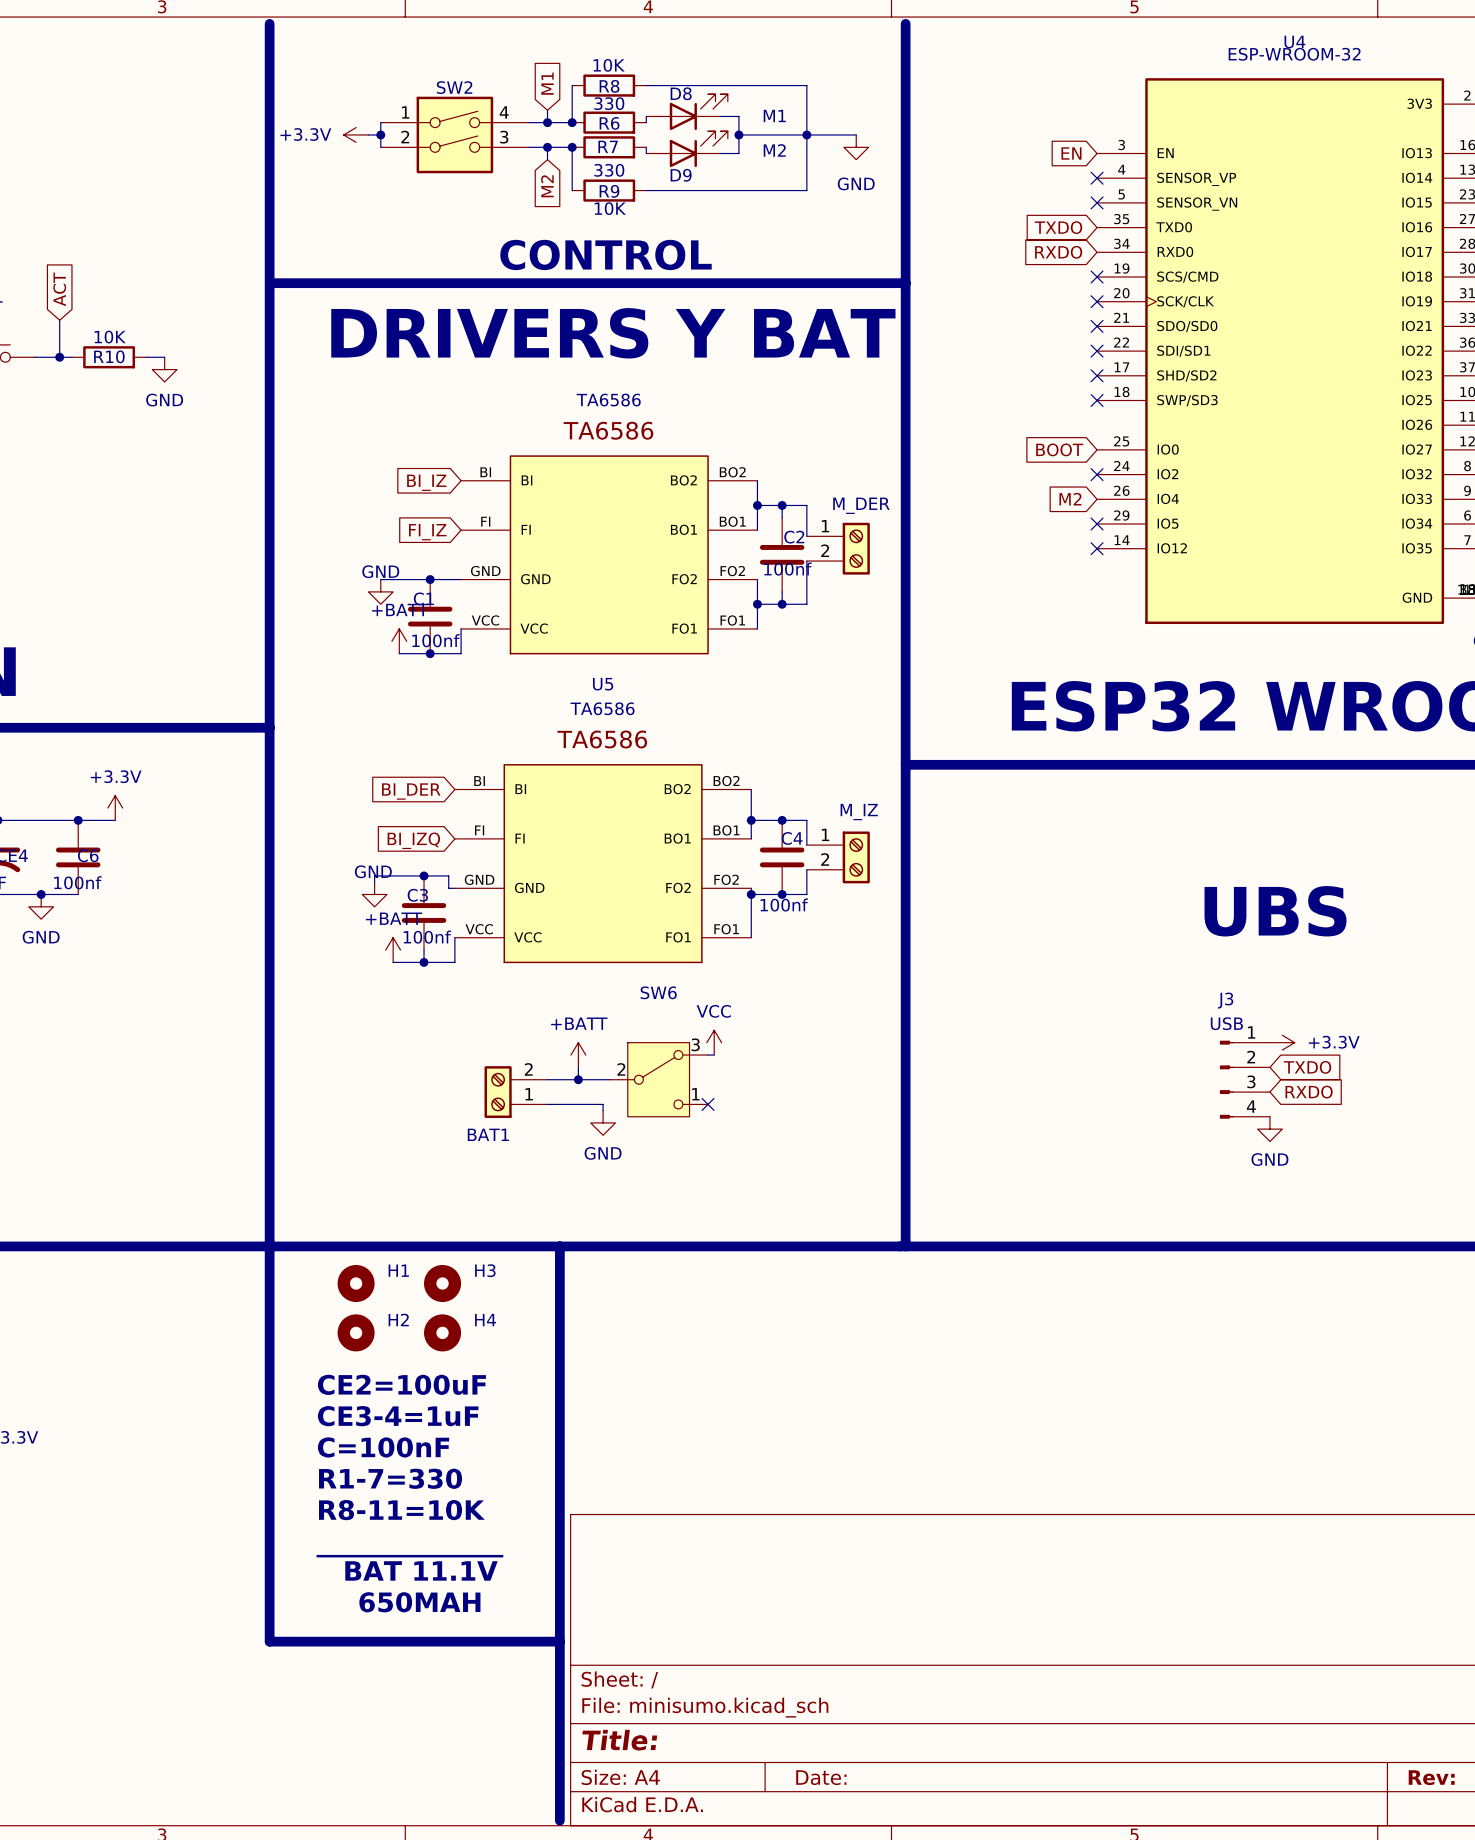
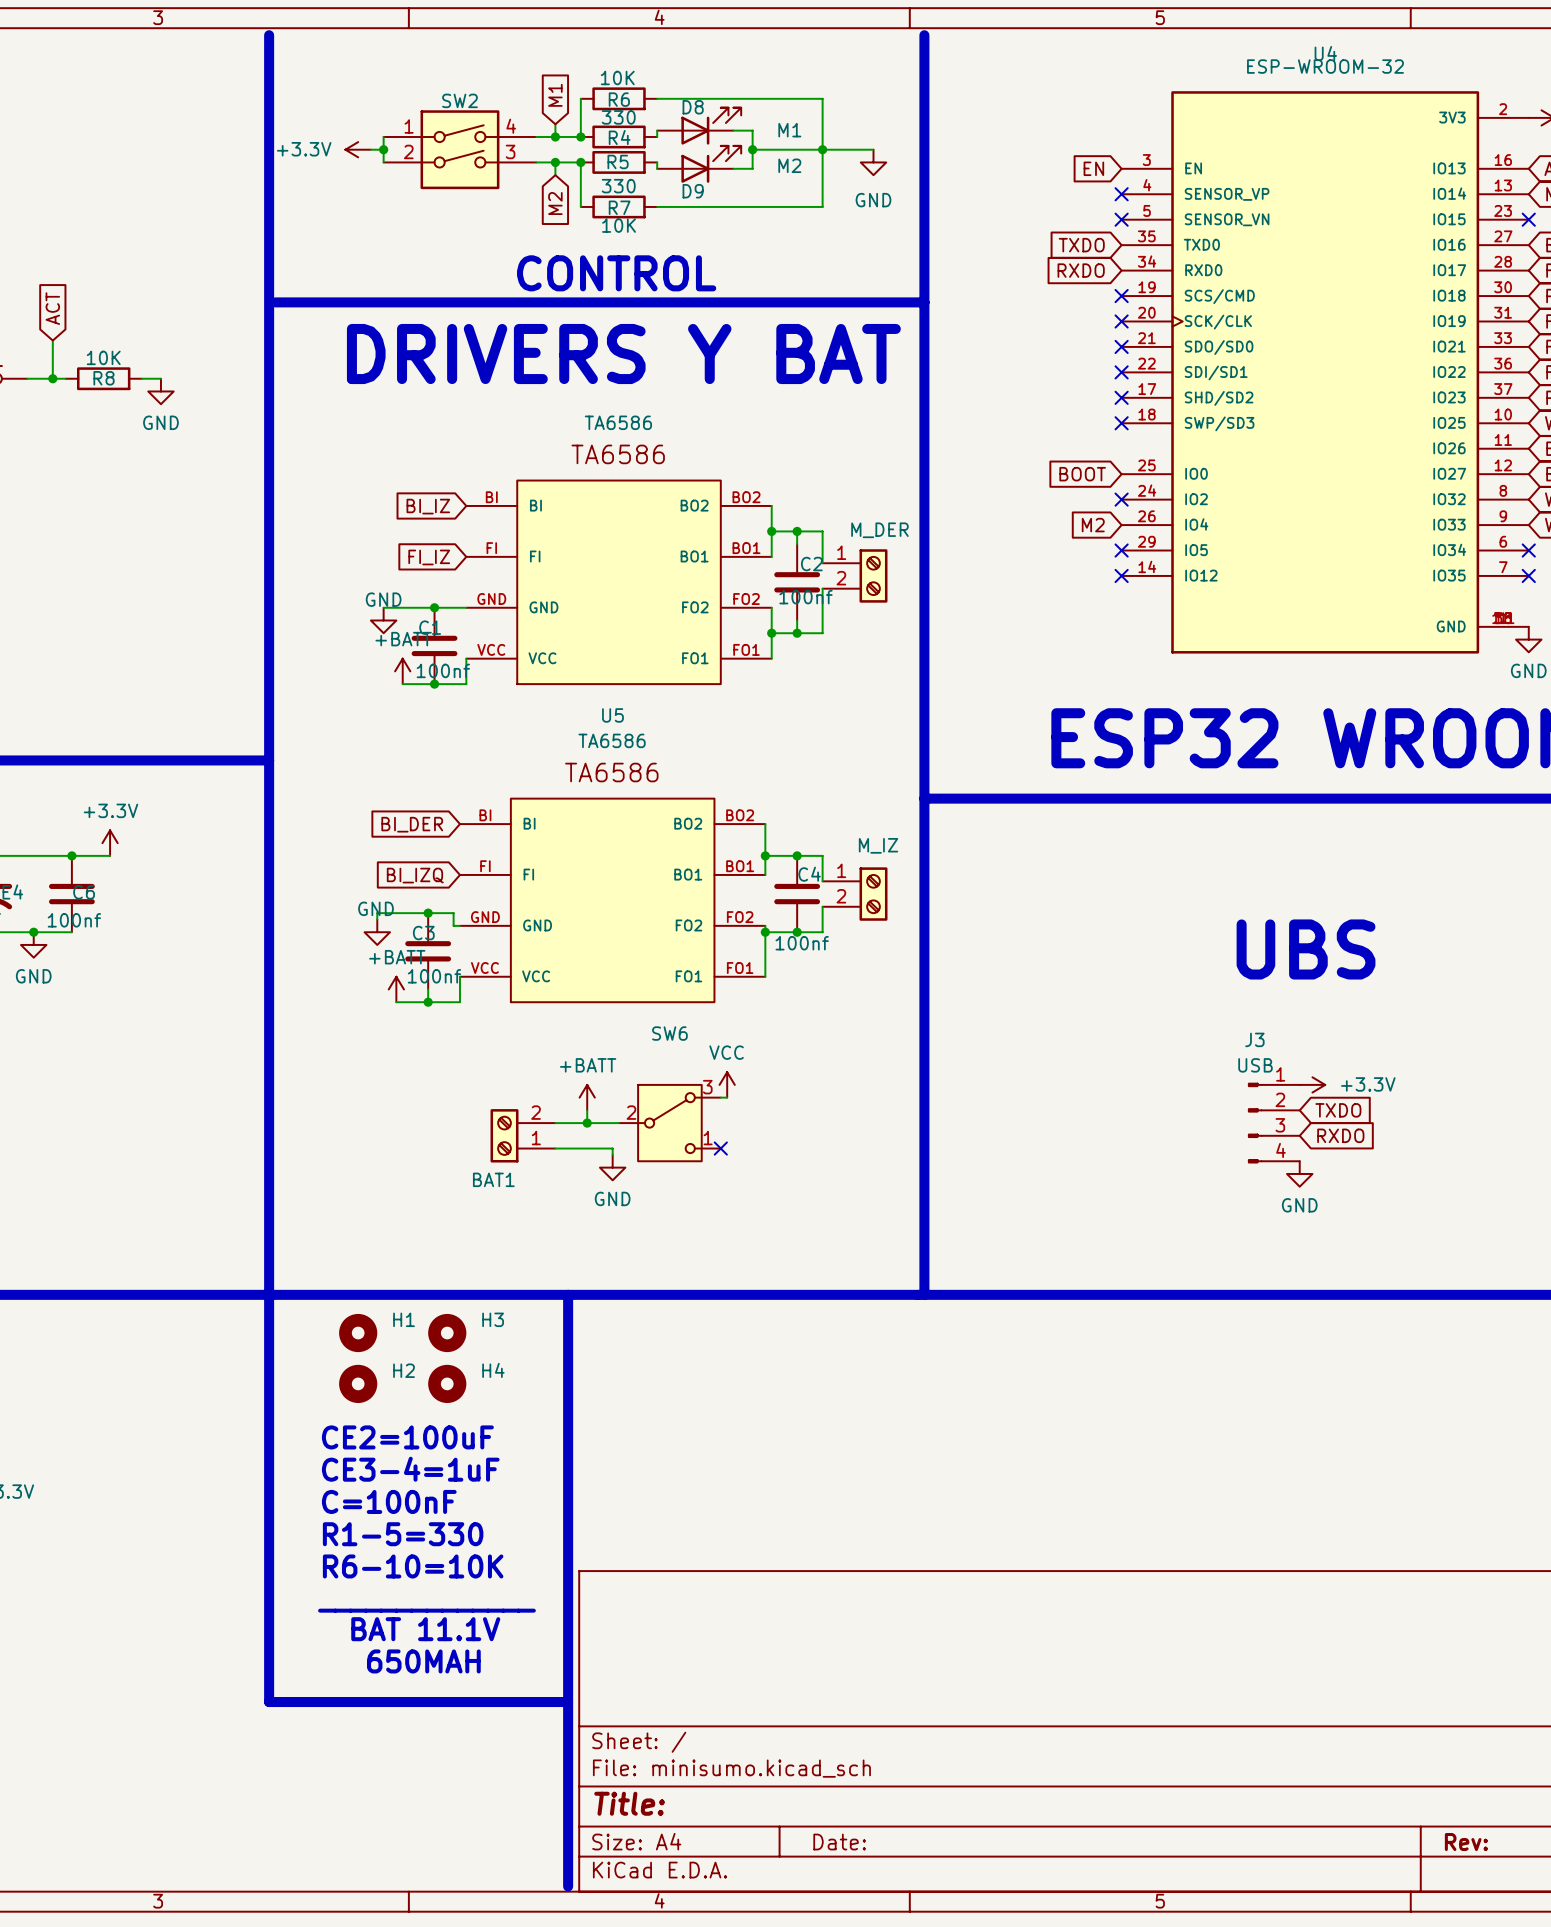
R8 name: R8 (609, 86) -> R6 (619, 99)
R6 name: R6 (609, 123) -> R4 (619, 137)
R7 name: R7 (608, 146) -> R5 (618, 161)
R9 name: R9 (609, 191) -> R7 (619, 207)
R10 name: R10 (109, 356) -> R8 (104, 378)
text: R1-7=330 (390, 1478) -> R1-5=330 (403, 1534)
text: R8-11=10K (401, 1510) -> R6-10=10K (413, 1566)

